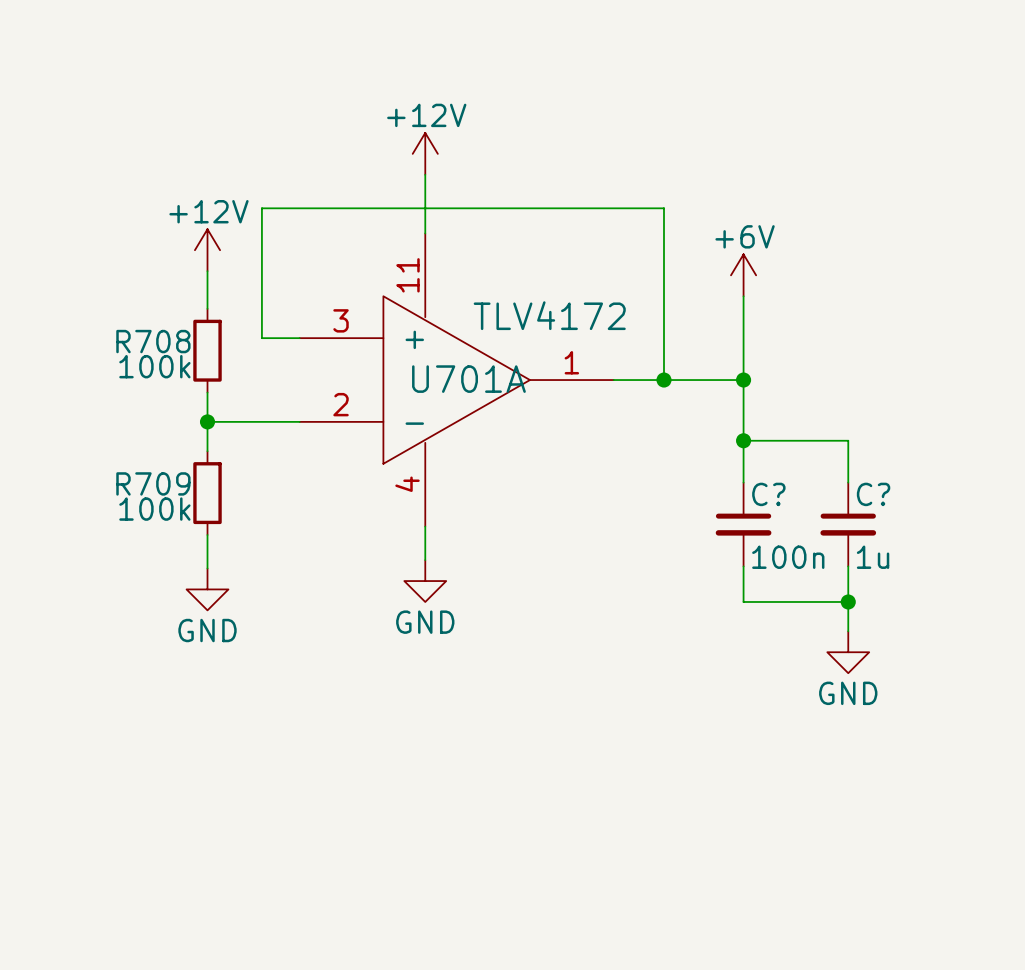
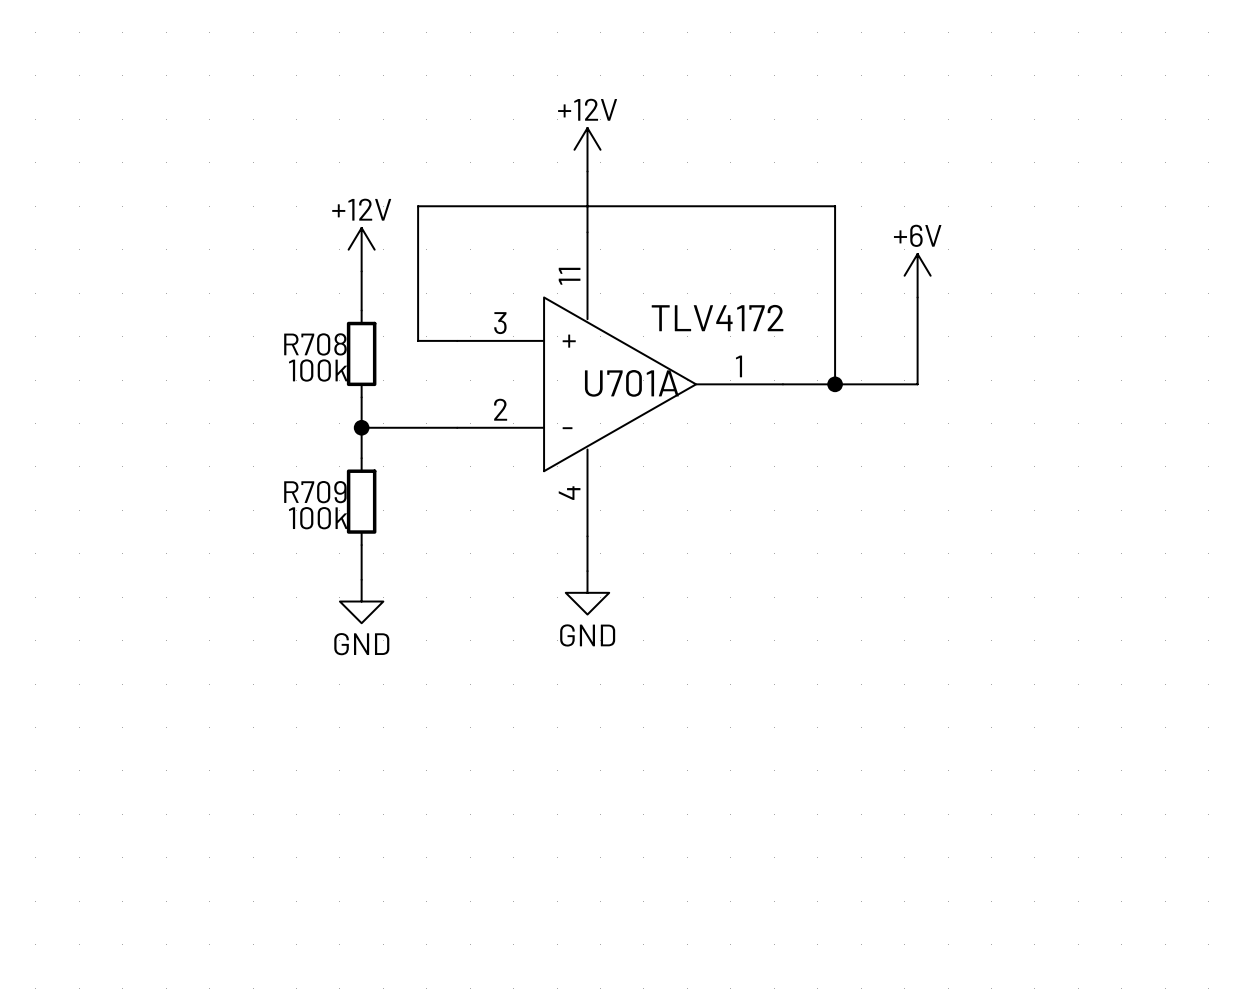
wire: (743, 380) (743, 482) -> none
junction: (743, 380) -> none
wire: (743, 440) (848, 440) (848, 482) -> none
junction: (743, 440) -> none
C?: 100n (743, 524) -> none
C?: 1u (848, 524) -> none
wire: (743, 566) (743, 601) (848, 601) -> none
wire: (848, 566) (848, 631) -> none
junction: (848, 601) -> none
power symbol: GND (848, 652) -> none

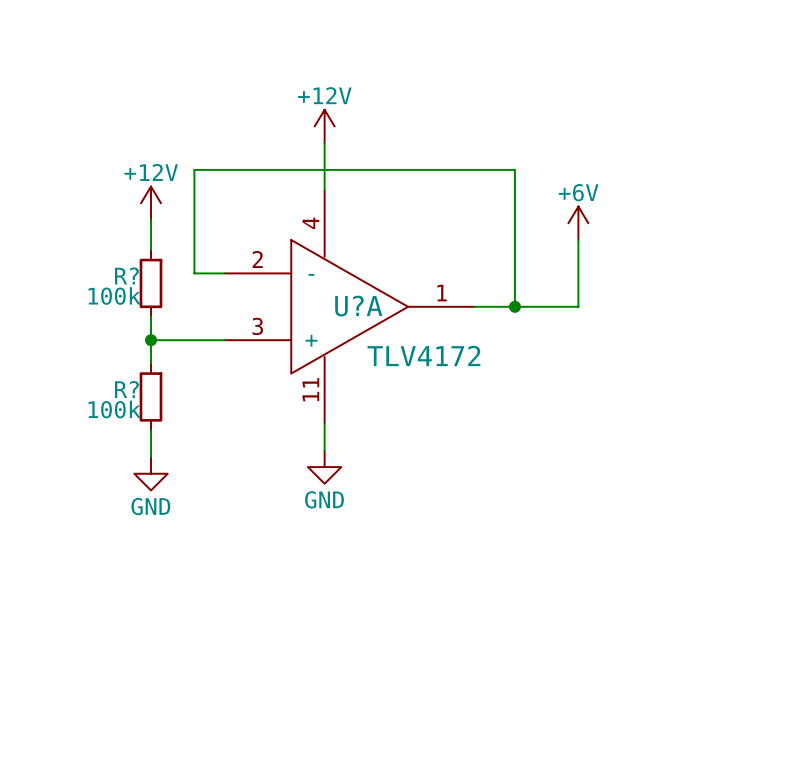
R708 name: R708 (315, 344) -> R? (126, 275)
U701A name: U701A (631, 383) -> U?A (358, 306)
U701A flip: as is (620, 384) -> up-down (349, 306)
R709 name: R709 (315, 492) -> R? (126, 389)

